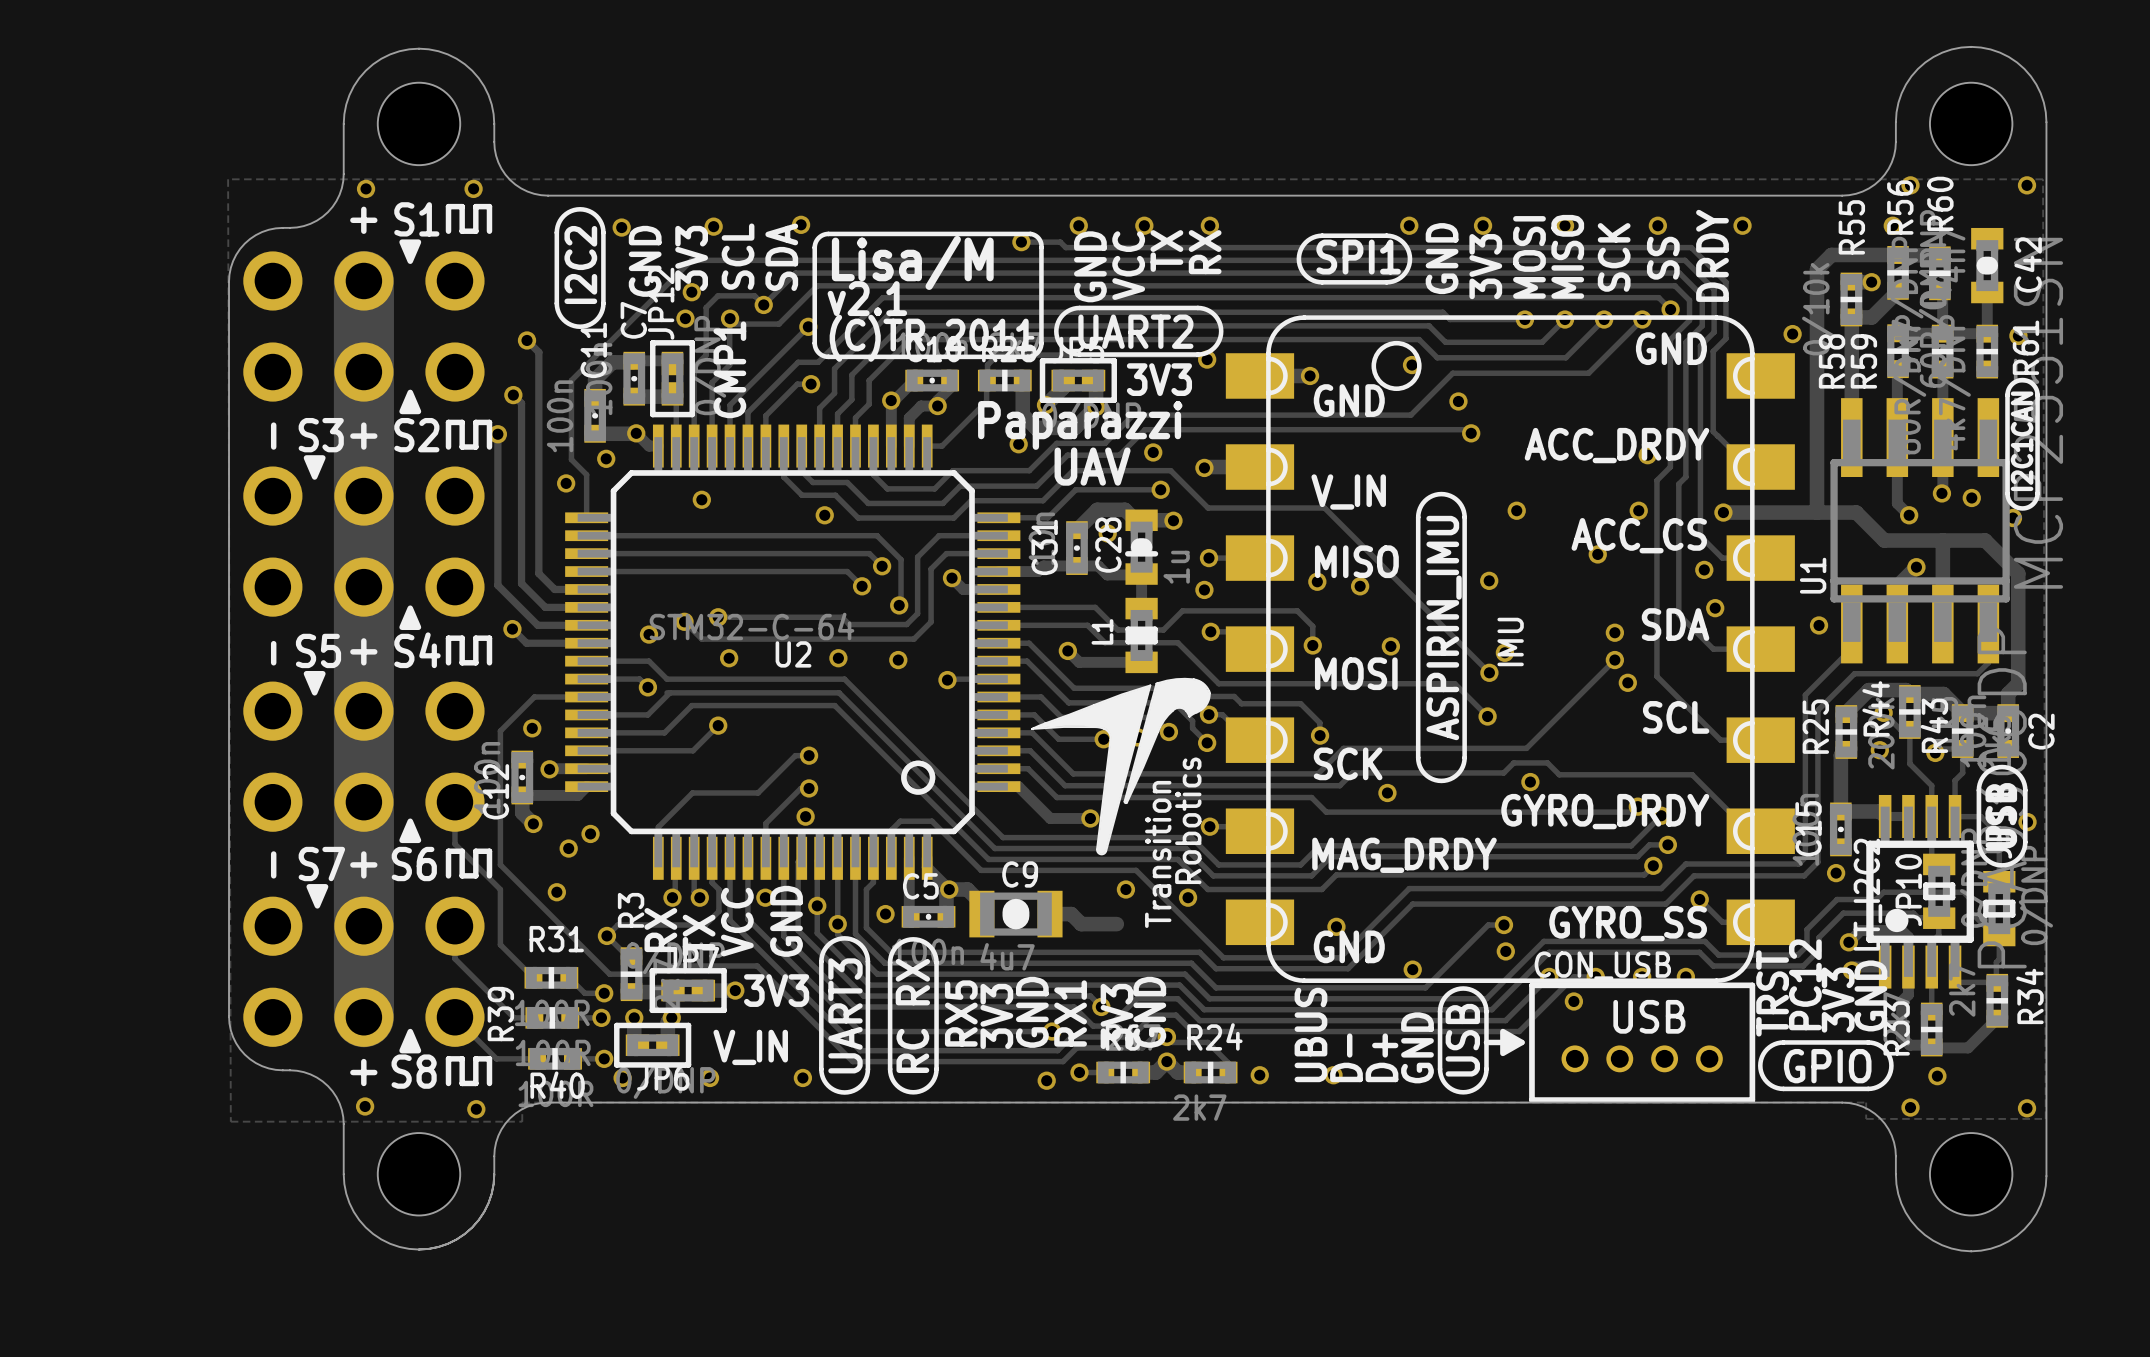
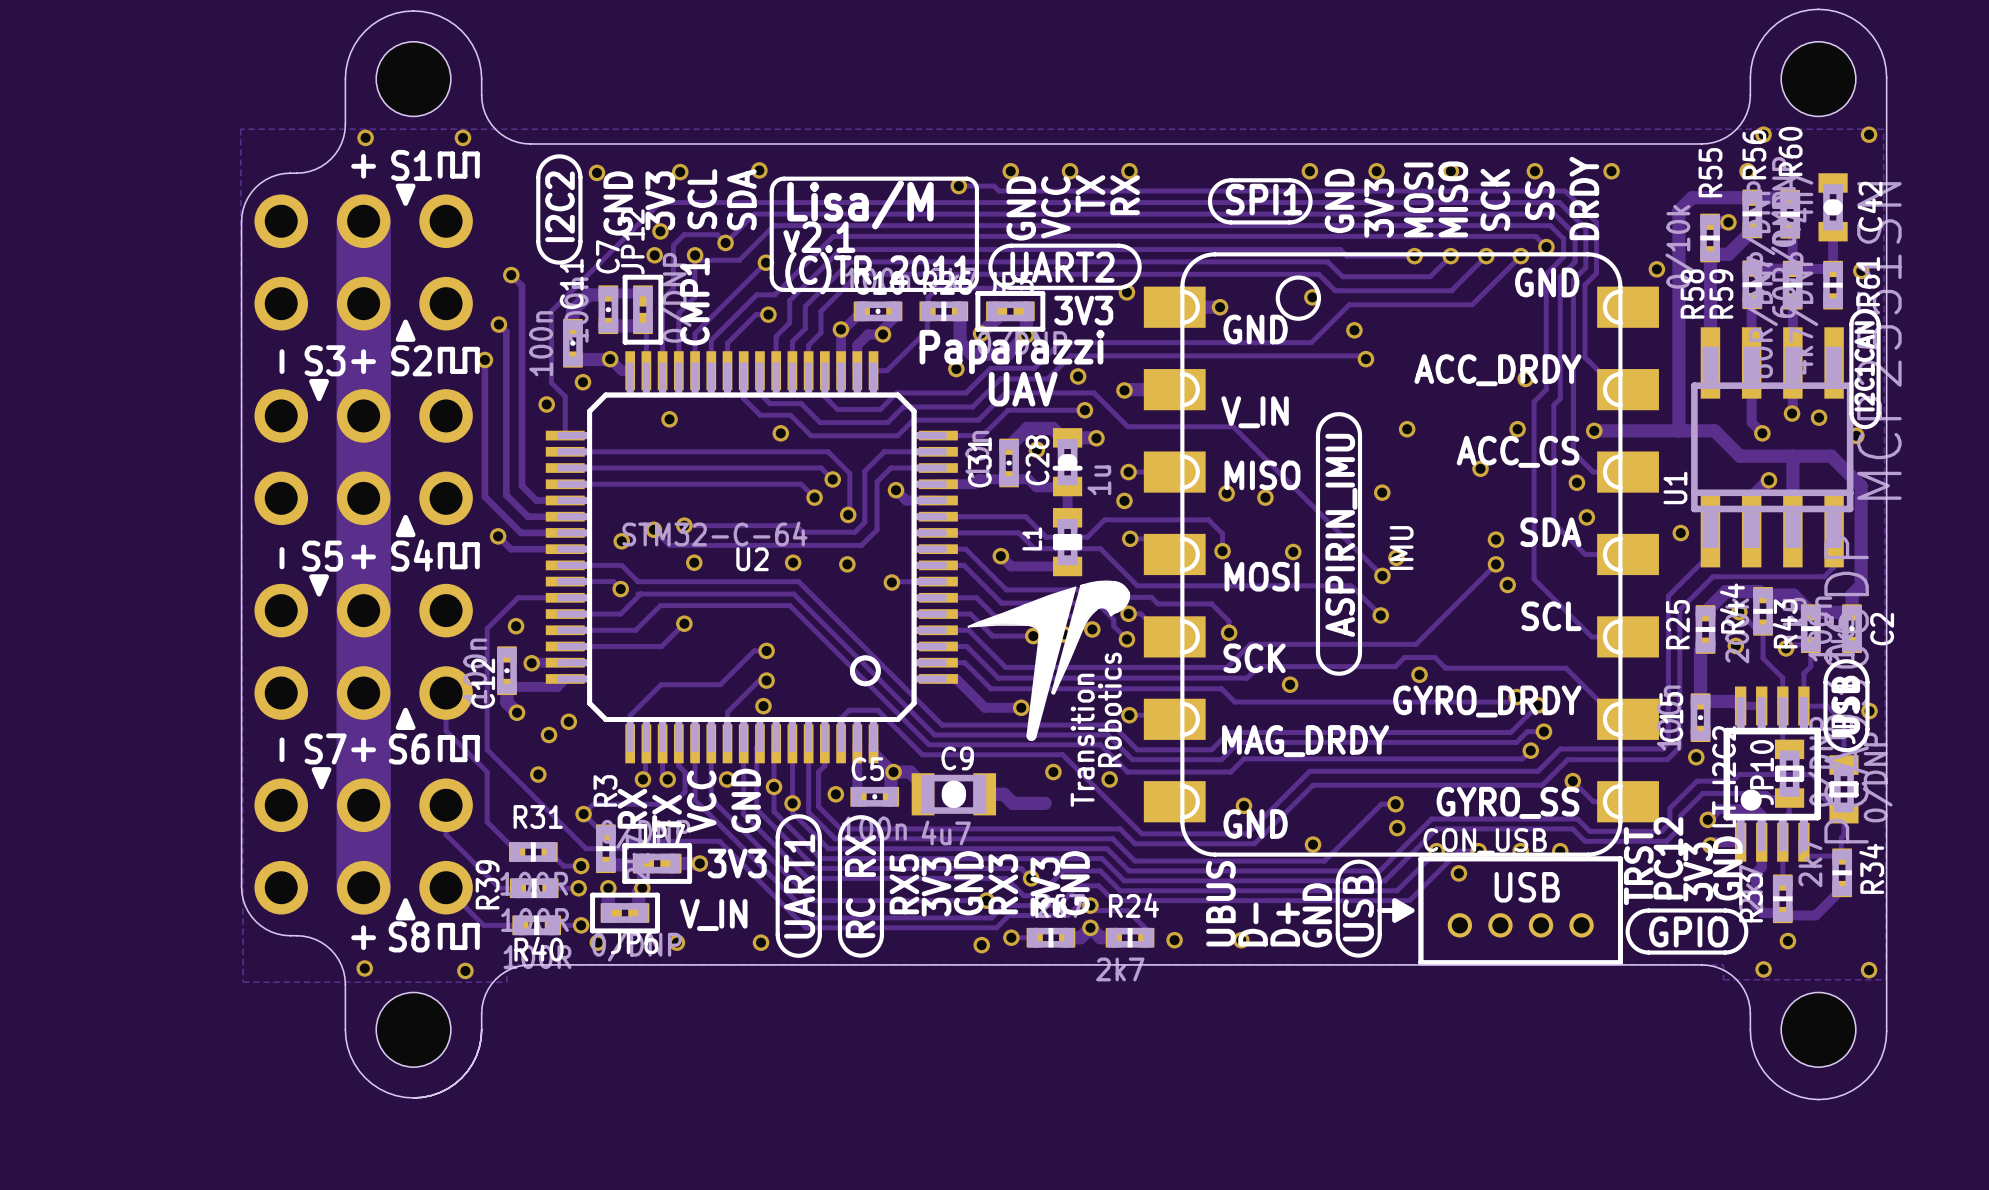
text: RX1 (1070, 1013) -> RX3 (1003, 884)
text: UART3 (845, 1015) -> UART1 (799, 886)

